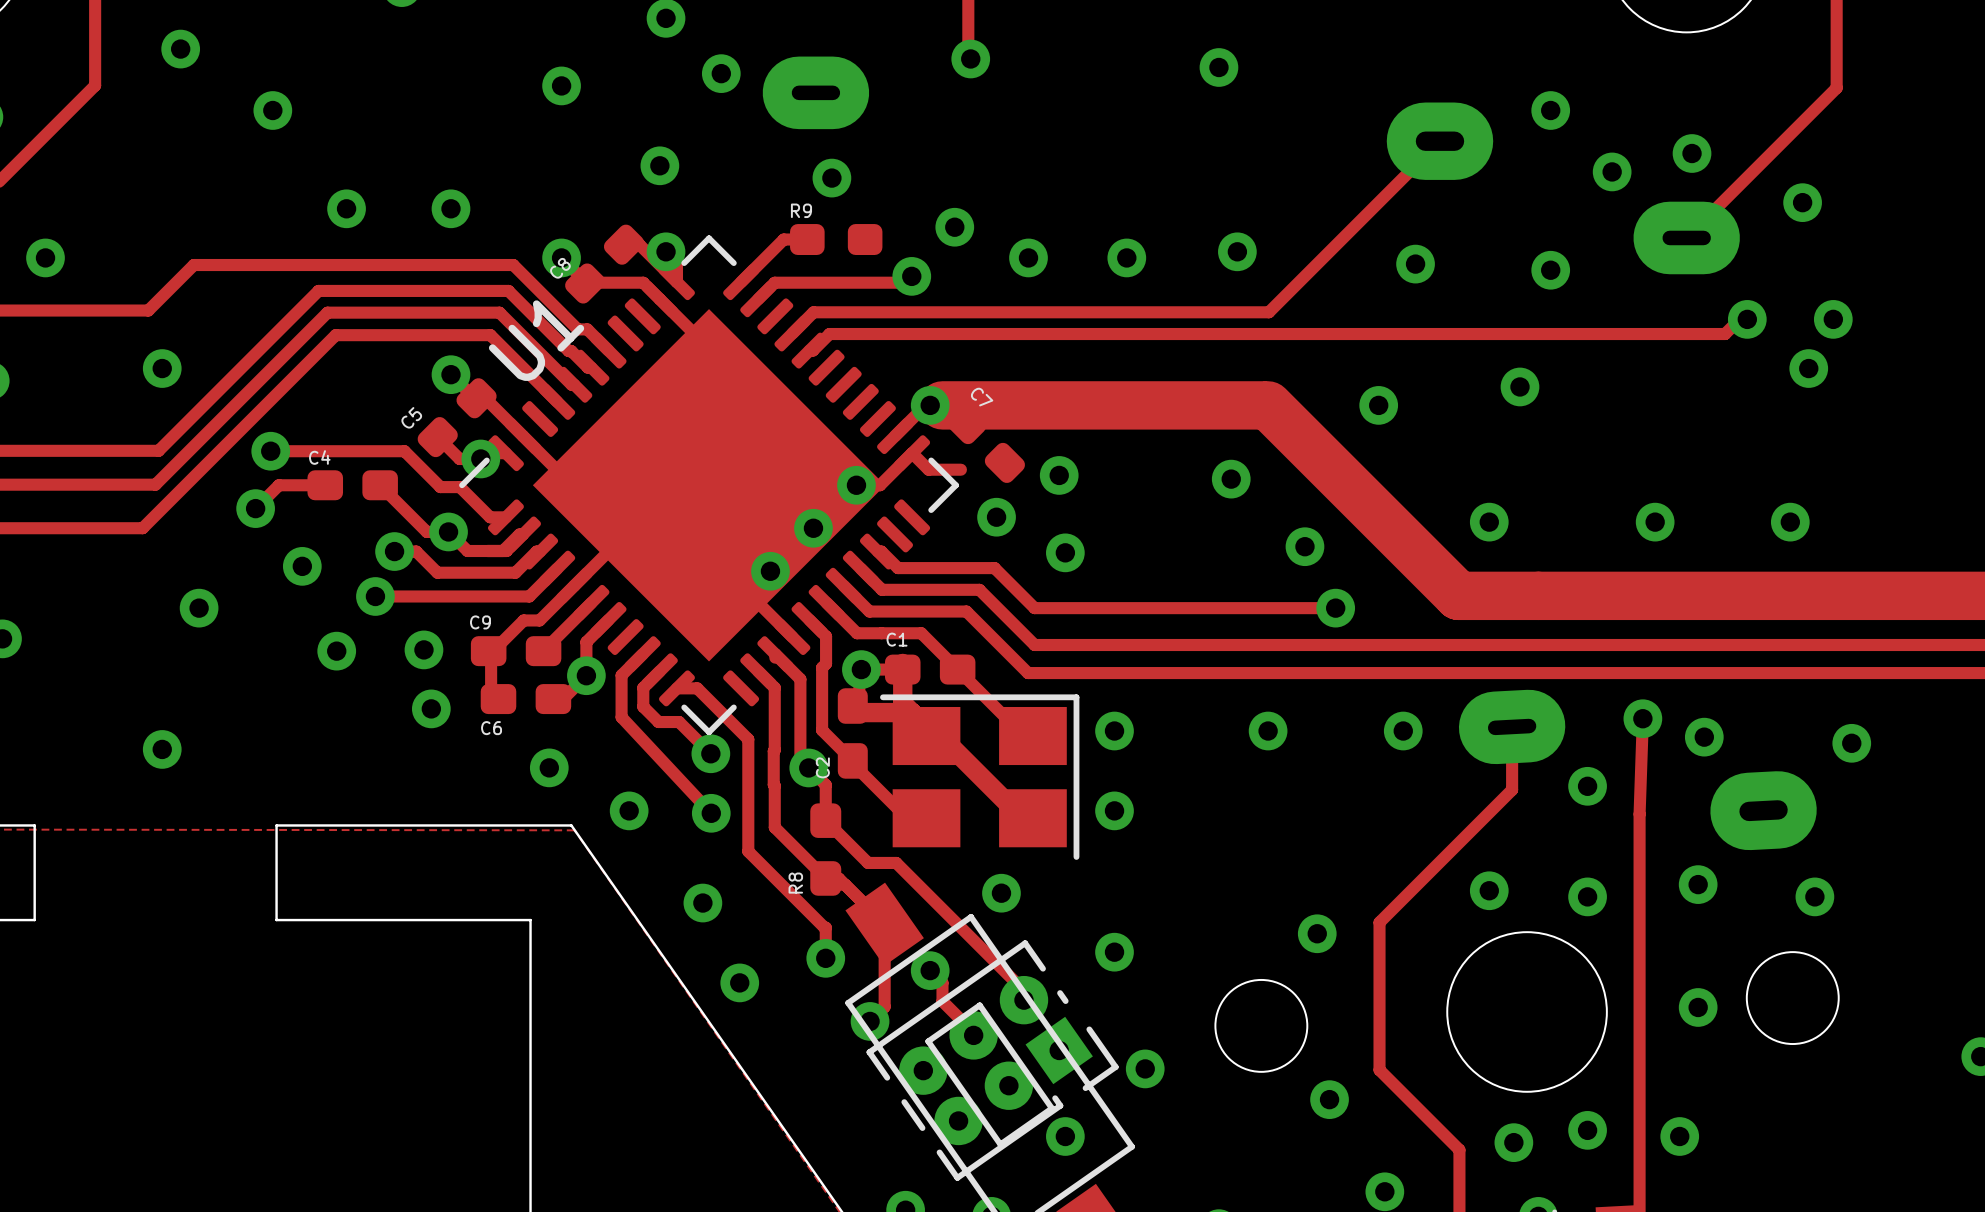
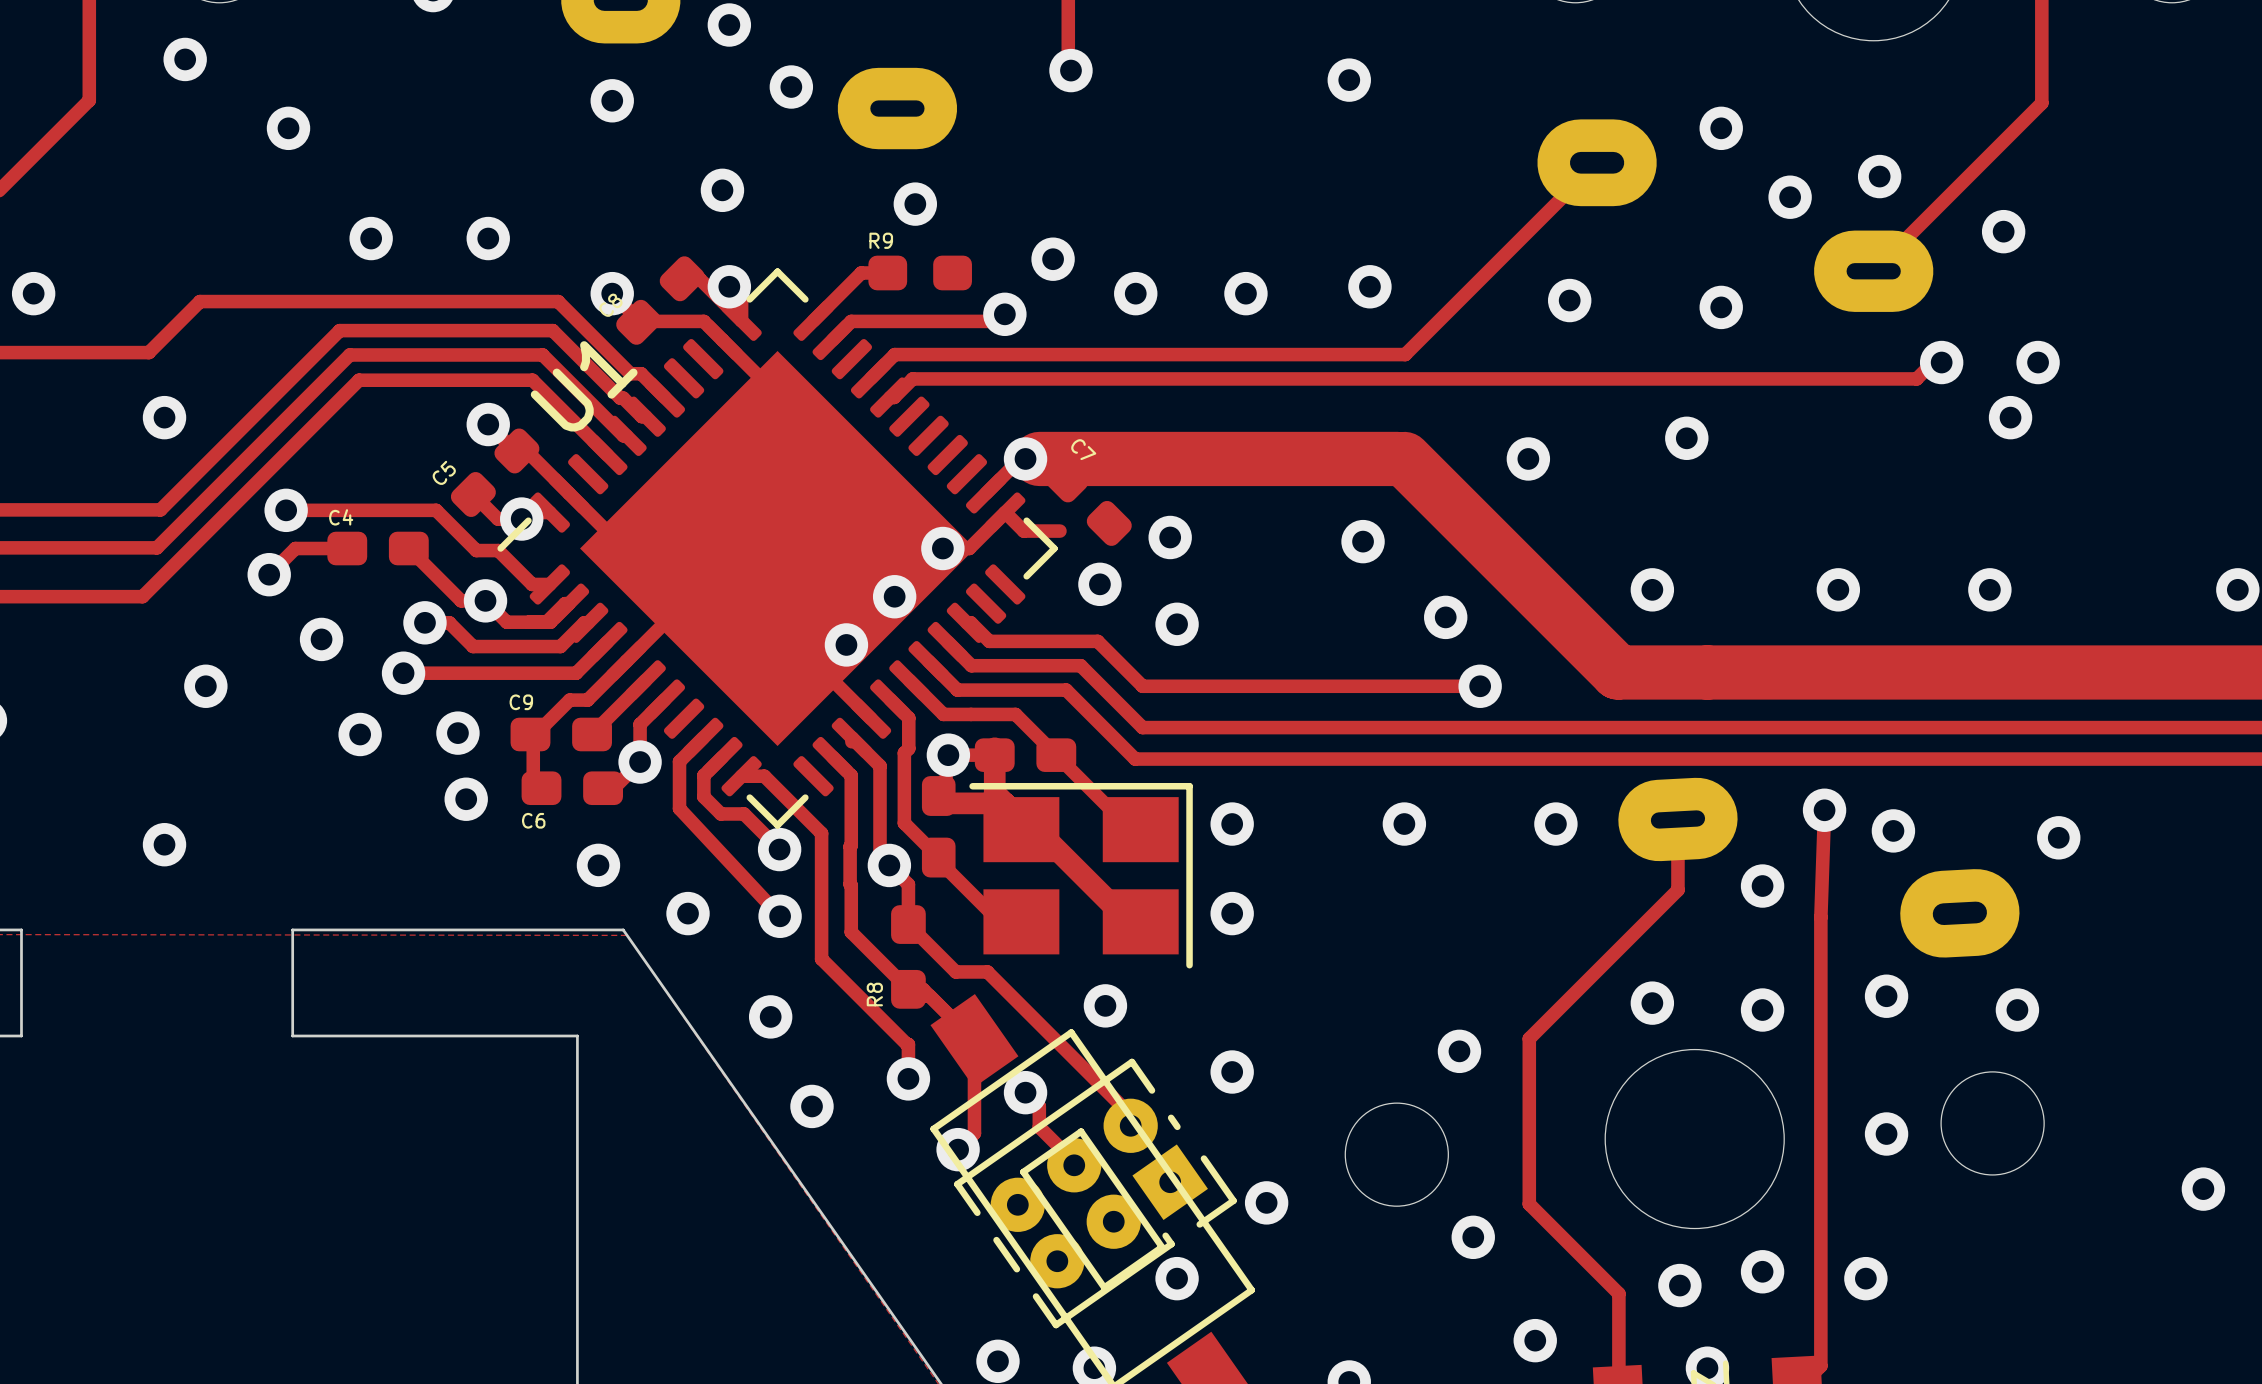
C1 name: C1 (897, 639) -> none
C2 name: C2 (822, 767) -> none

